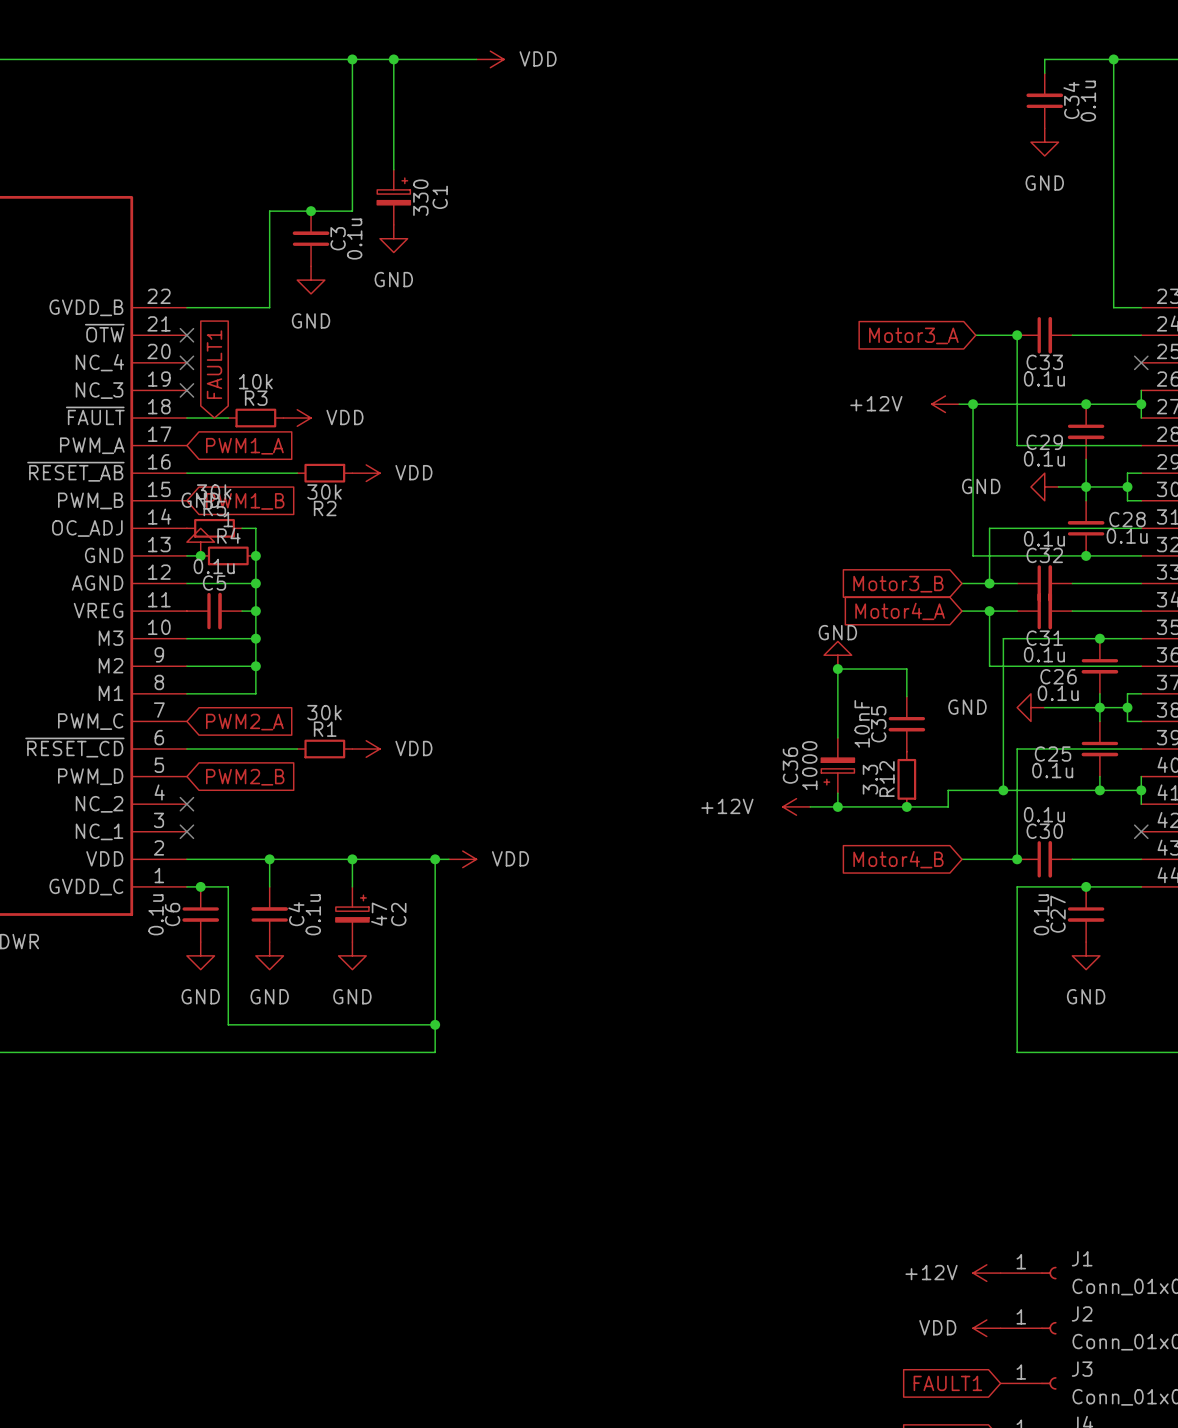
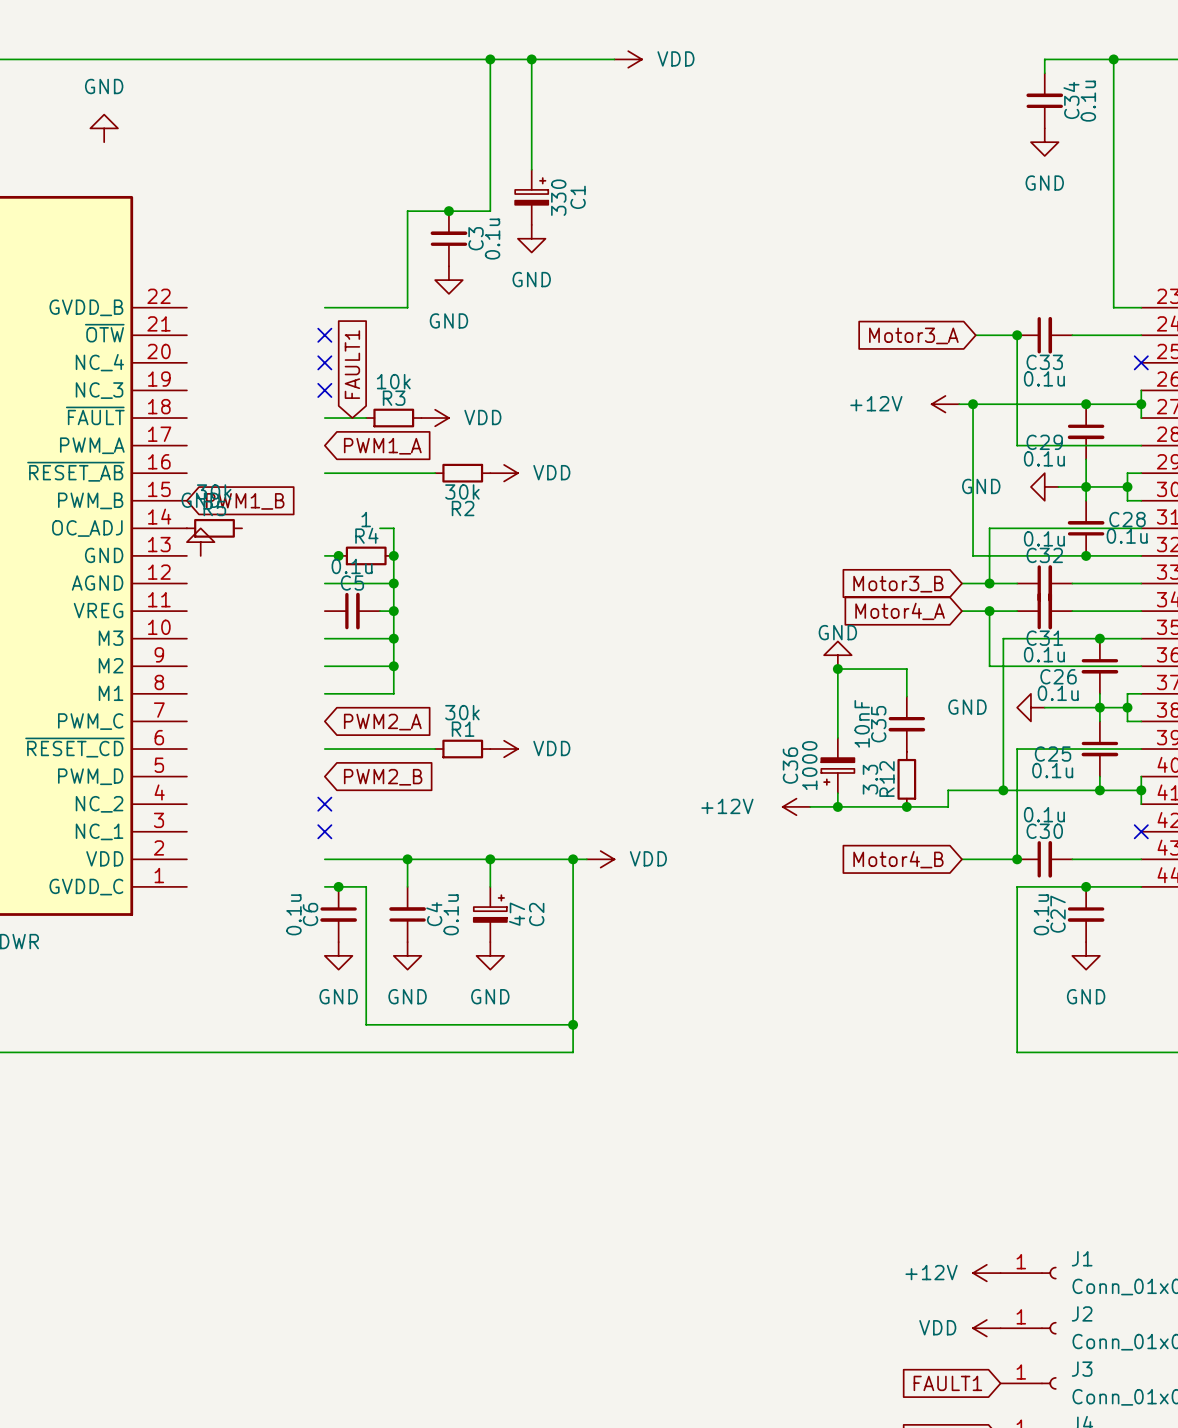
wire: (352, 59) (352, 211) (269, 211) (269, 307) (186, 307) -> (490, 59) (490, 211) (407, 211) (407, 307) (324, 307)
junction: (352, 59) -> none
wire: (393, 59) (393, 169) -> (531, 59) (531, 169)
junction: (393, 59) -> none
wire: none -> (476, 59) (614, 59)
junction: none -> (490, 59)
power symbol position: VDD (490, 59) -> VDD (628, 59)
junction: none -> (531, 59)
power symbol: none -> GND (104, 128)
C1 position: (393, 197) -> (531, 197)
junction: (311, 211) -> none
junction: none -> (448, 211)
C3 position: (311, 238) -> (448, 238)
power symbol: GND (393, 238) -> none
power symbol: none -> GND (531, 238)
power symbol: GND (311, 280) -> none
power symbol: none -> GND (448, 280)
no-connect mark: (186, 335) -> none
no-connect mark: none -> (324, 335)
no-connect mark: (186, 362) -> none
no-connect mark: none -> (324, 362)
global label position: FAULT1 (214, 364) -> FAULT1 (352, 364)
no-connect mark: (186, 390) -> none
no-connect mark: none -> (324, 390)
wire: (186, 418) (228, 418) -> (324, 418) (366, 418)
R3 position: (255, 418) -> (393, 418)
power symbol: VDD (297, 418) -> none
power symbol: none -> VDD (435, 418)
global label position: PWM1_A (244, 446) -> PWM1_A (382, 446)
wire: (186, 473) (297, 473) -> (324, 473) (435, 473)
R2 position: (324, 473) -> (462, 473)
power symbol: VDD (366, 473) -> none
power symbol: none -> VDD (504, 473)
wire: (242, 528) (255, 528) (255, 693) (186, 693) -> (380, 528) (393, 528) (393, 693) (324, 693)
wire: (186, 555) (200, 555) -> (324, 555) (338, 555)
junction: (200, 555) -> none
R4 position: (228, 555) -> (366, 555)
junction: (255, 555) -> none
junction: none -> (338, 555)
junction: none -> (393, 555)
wire: (186, 583) (255, 583) -> (324, 583) (393, 583)
junction: (255, 583) -> none
junction: none -> (393, 583)
C5 position: (214, 611) -> (352, 611)
wire: (242, 611) (255, 611) -> (380, 611) (393, 611)
junction: (255, 611) -> none
junction: none -> (393, 611)
wire: (186, 638) (255, 638) -> (324, 638) (393, 638)
junction: (255, 638) -> none
junction: none -> (393, 638)
wire: (186, 666) (255, 666) -> (324, 666) (393, 666)
junction: (255, 666) -> none
junction: none -> (393, 666)
global label position: PWM2_A (244, 722) -> PWM2_A (382, 722)
wire: (186, 749) (297, 749) -> (324, 749) (435, 749)
R1 position: (324, 749) -> (462, 749)
power symbol: VDD (366, 749) -> none
power symbol: none -> VDD (504, 749)
global label position: PWM2_B (245, 777) -> PWM2_B (383, 777)
no-connect mark: (186, 804) -> none
no-connect mark: none -> (324, 804)
no-connect mark: (186, 831) -> none
no-connect mark: none -> (324, 831)
wire: (186, 859) (324, 859) -> (448, 859) (586, 859)
wire: (269, 859) (269, 886) -> (407, 859) (407, 886)
junction: (269, 859) -> none
wire: (352, 859) (352, 886) -> (490, 859) (490, 886)
junction: (352, 859) -> none
junction: none -> (407, 859)
wire: (435, 859) (435, 1052) -> (573, 859) (573, 1052) (435, 1052)
junction: (435, 859) -> none
power symbol: VDD (462, 859) -> none
junction: none -> (490, 859)
junction: none -> (573, 859)
power symbol: none -> VDD (600, 859)
wire: (186, 886) (228, 886) (228, 1024) (366, 1024) -> (324, 886) (366, 886) (366, 1024)
junction: (200, 886) -> none
junction: none -> (338, 886)
C6 position: (200, 914) -> (338, 914)
C4 position: (269, 914) -> (407, 914)
C2 position: (352, 914) -> (490, 914)
power symbol: GND (200, 955) -> none
power symbol: GND (269, 955) -> none
power symbol position: GND (352, 955) -> GND (338, 955)
power symbol: none -> GND (407, 955)
power symbol: none -> GND (490, 955)
wire: none -> (435, 1024) (573, 1024)
junction: (435, 1024) -> none
junction: none -> (573, 1024)

